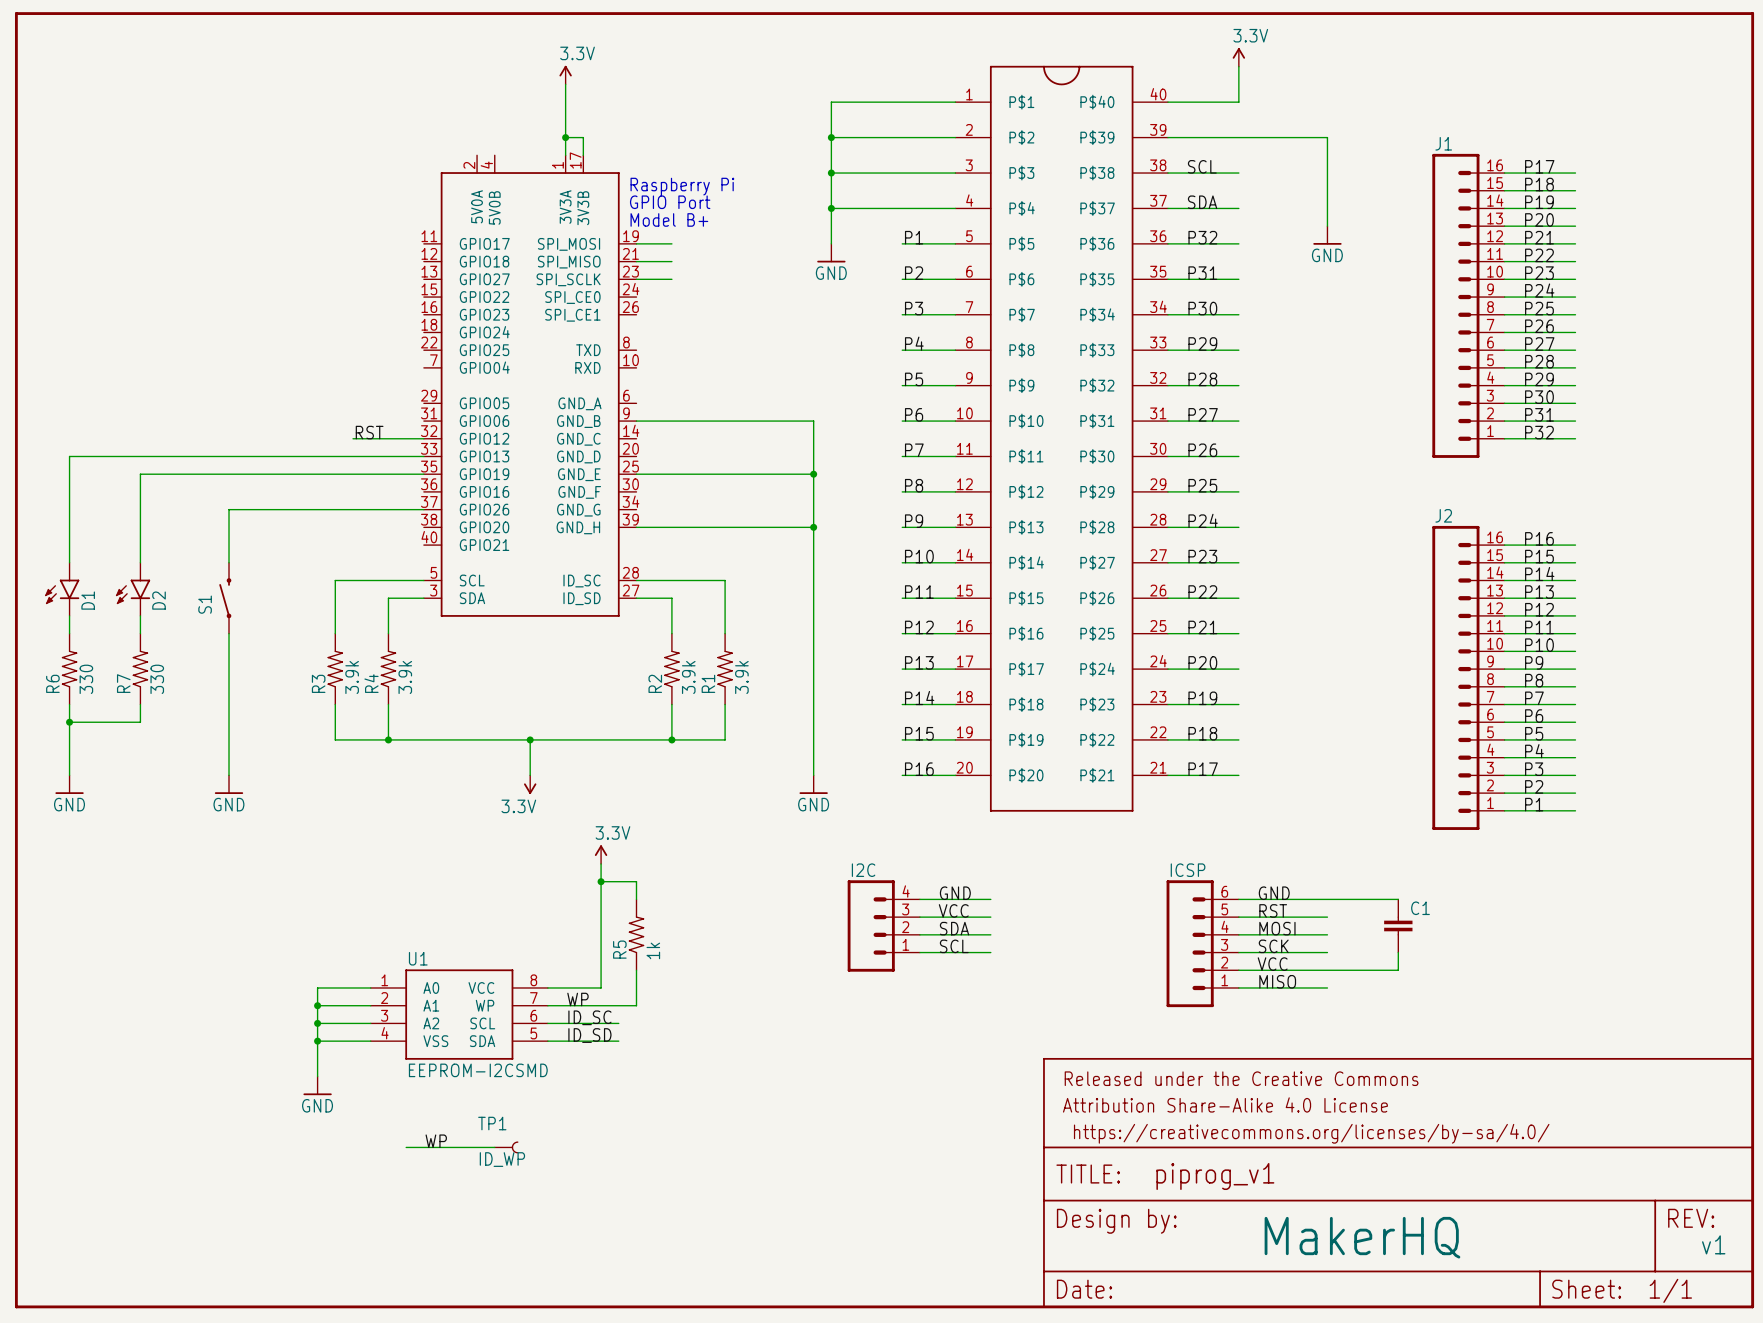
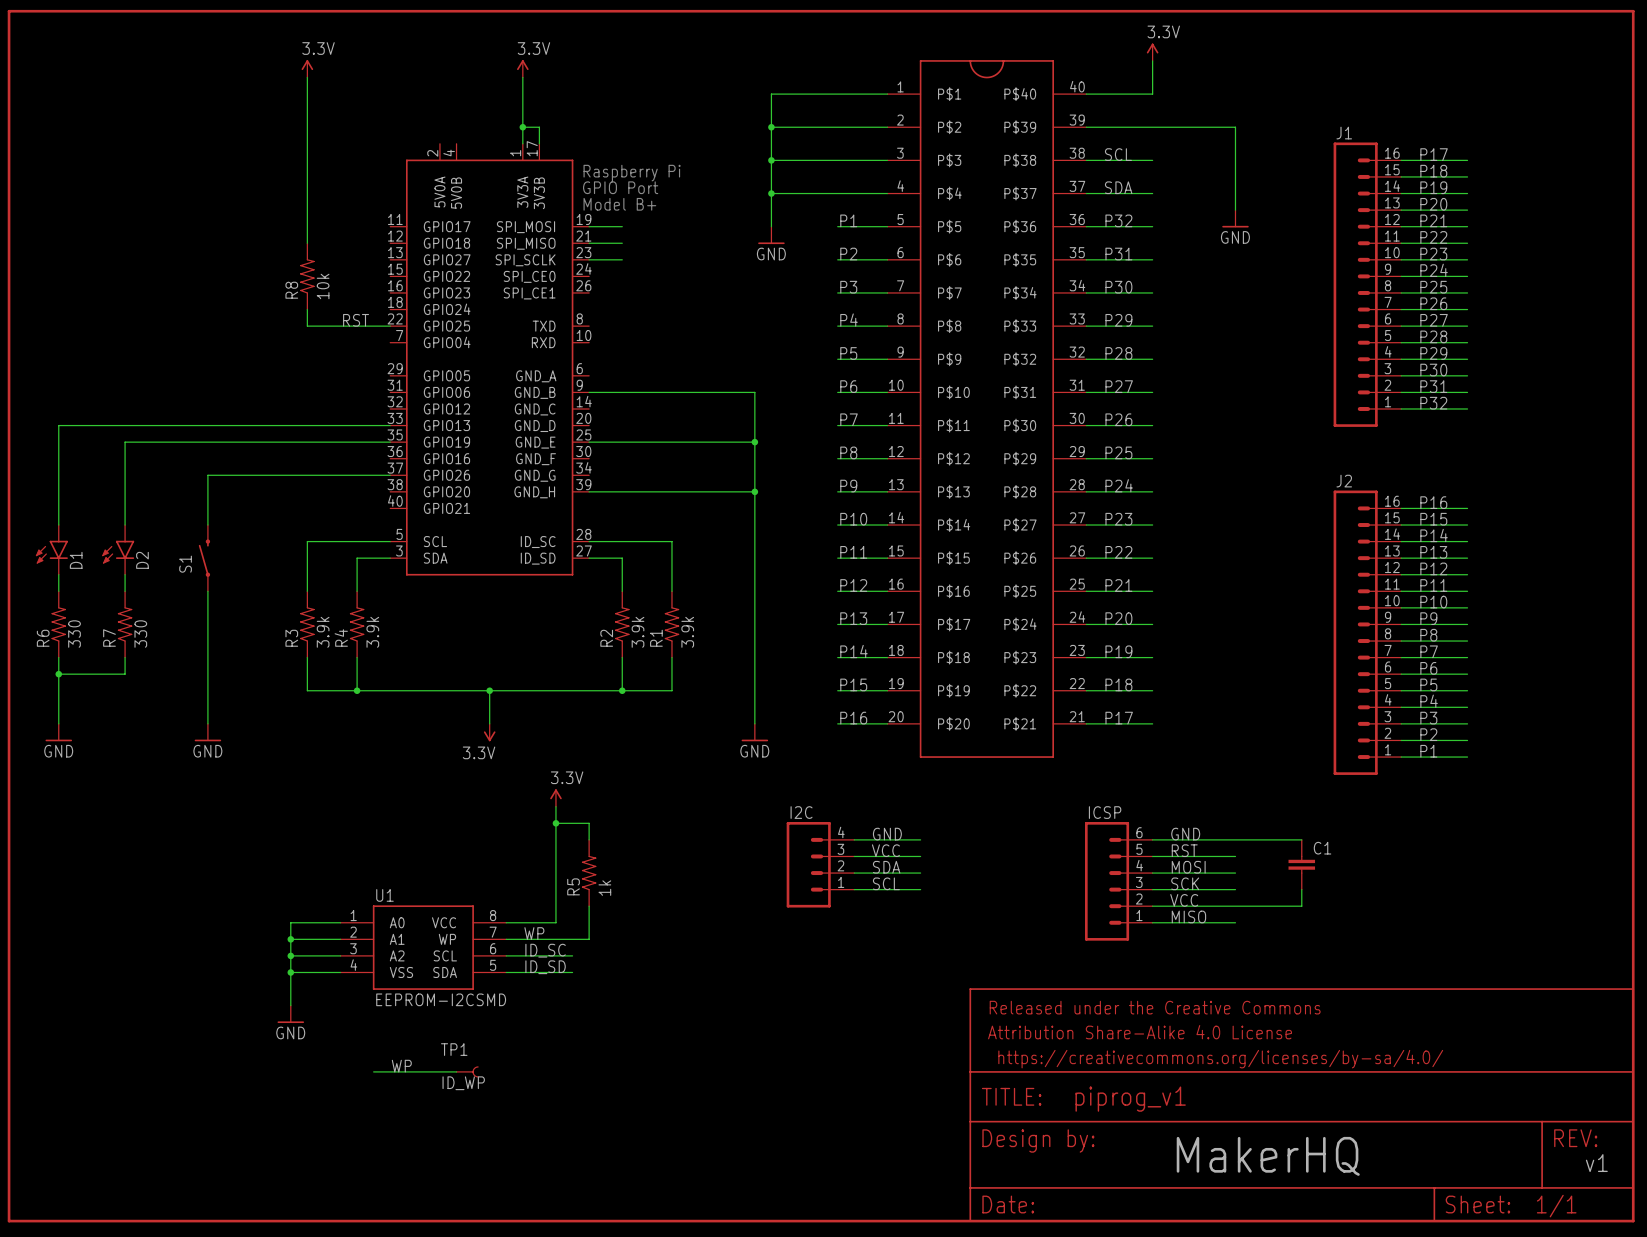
power symbol: none -> 3.3V (307, 68)
wire: none -> (307, 77) (307, 243)
R8: none -> 10k (307, 276)
wire: none -> (307, 309) (307, 326) (390, 326)
label position: RST (369, 432) -> RST (356, 320)
wire: (353, 438) (423, 438) -> none

